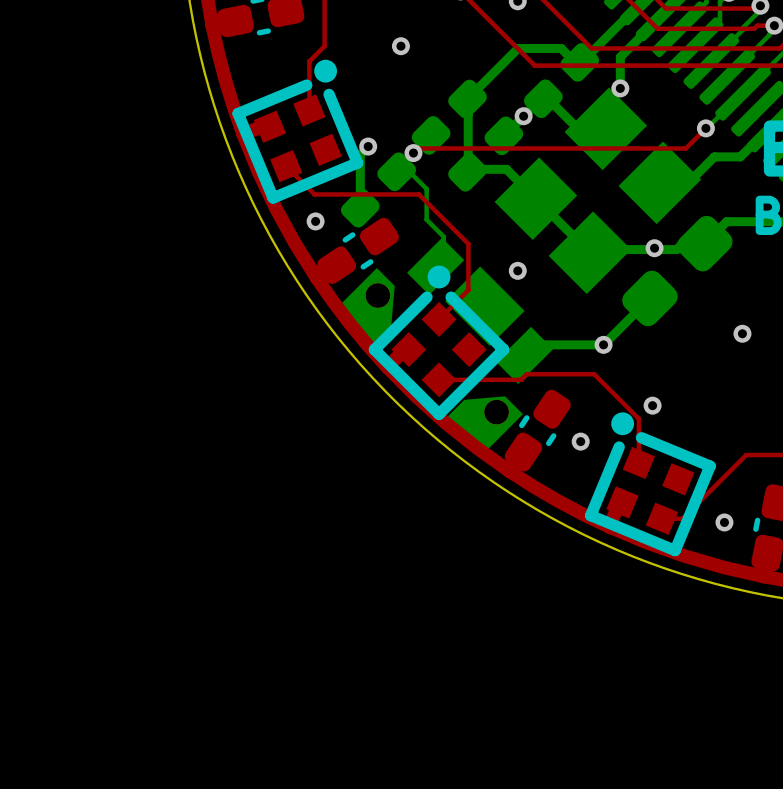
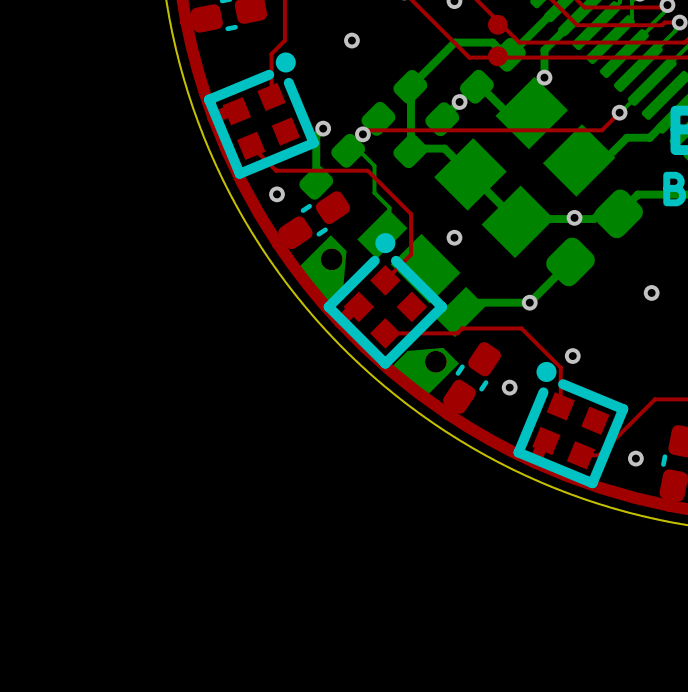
part: none -> (497, 24)
part: none -> (497, 56)

